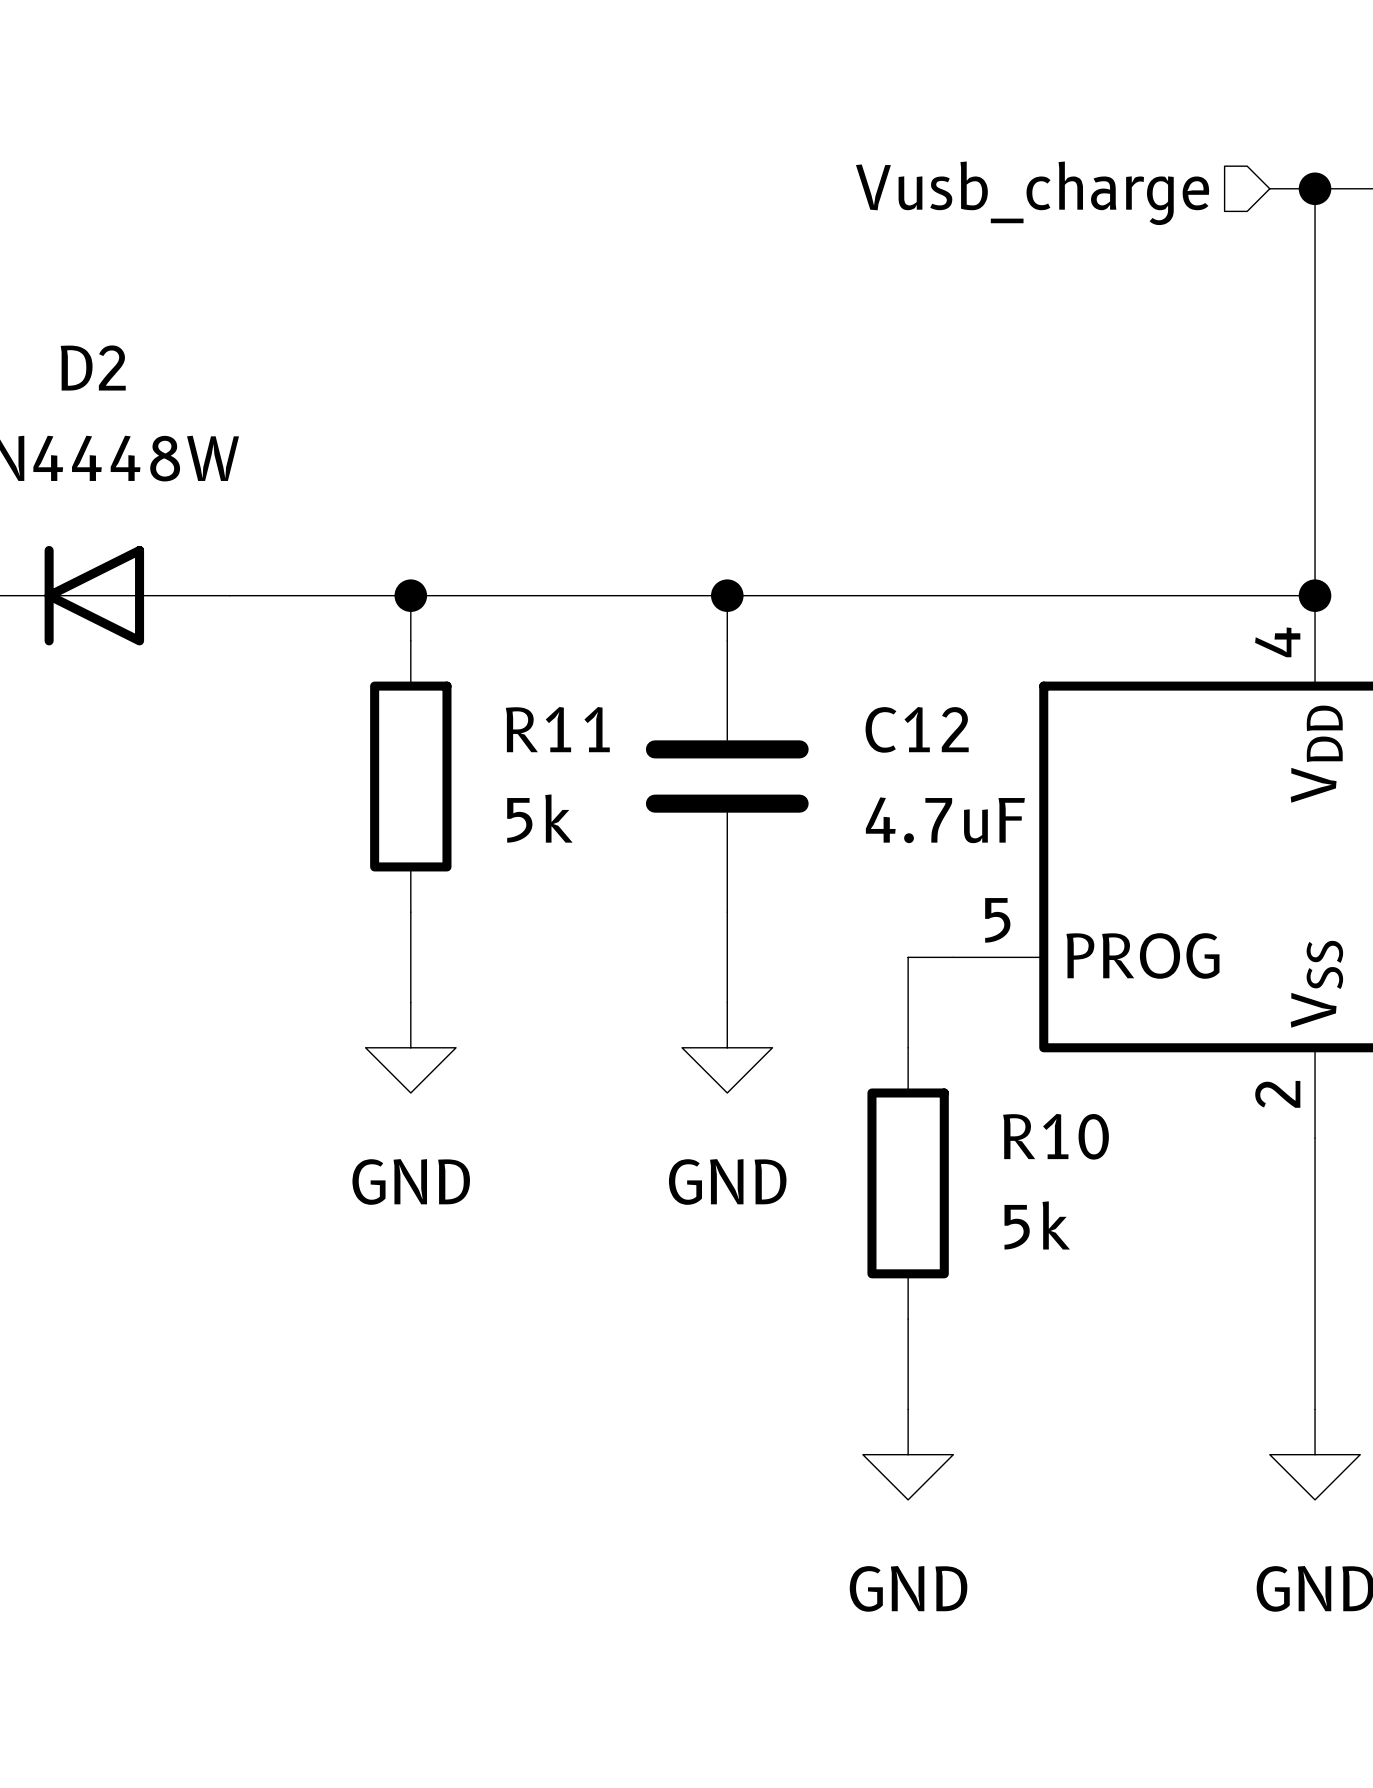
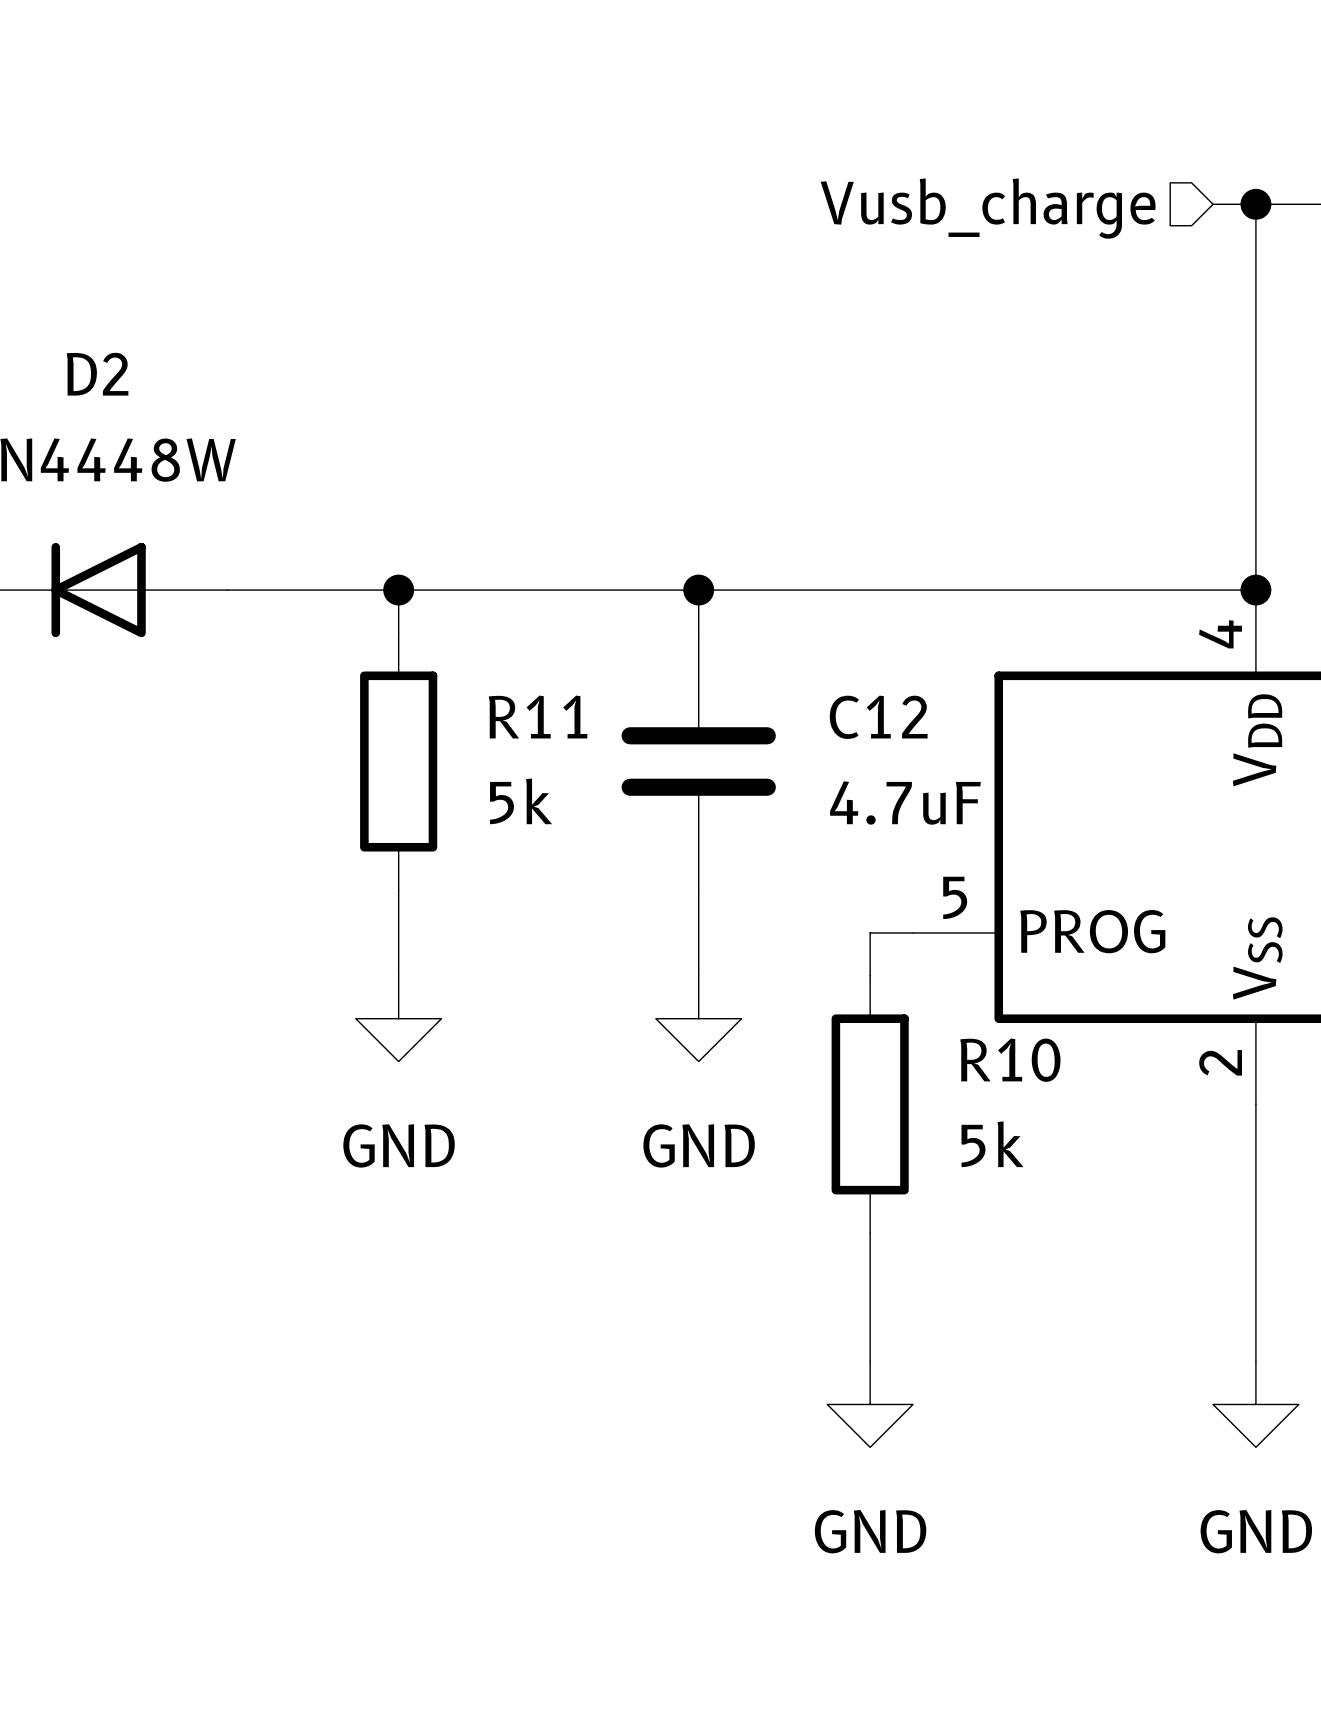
R10 position: (908, 1183) -> (870, 1104)

